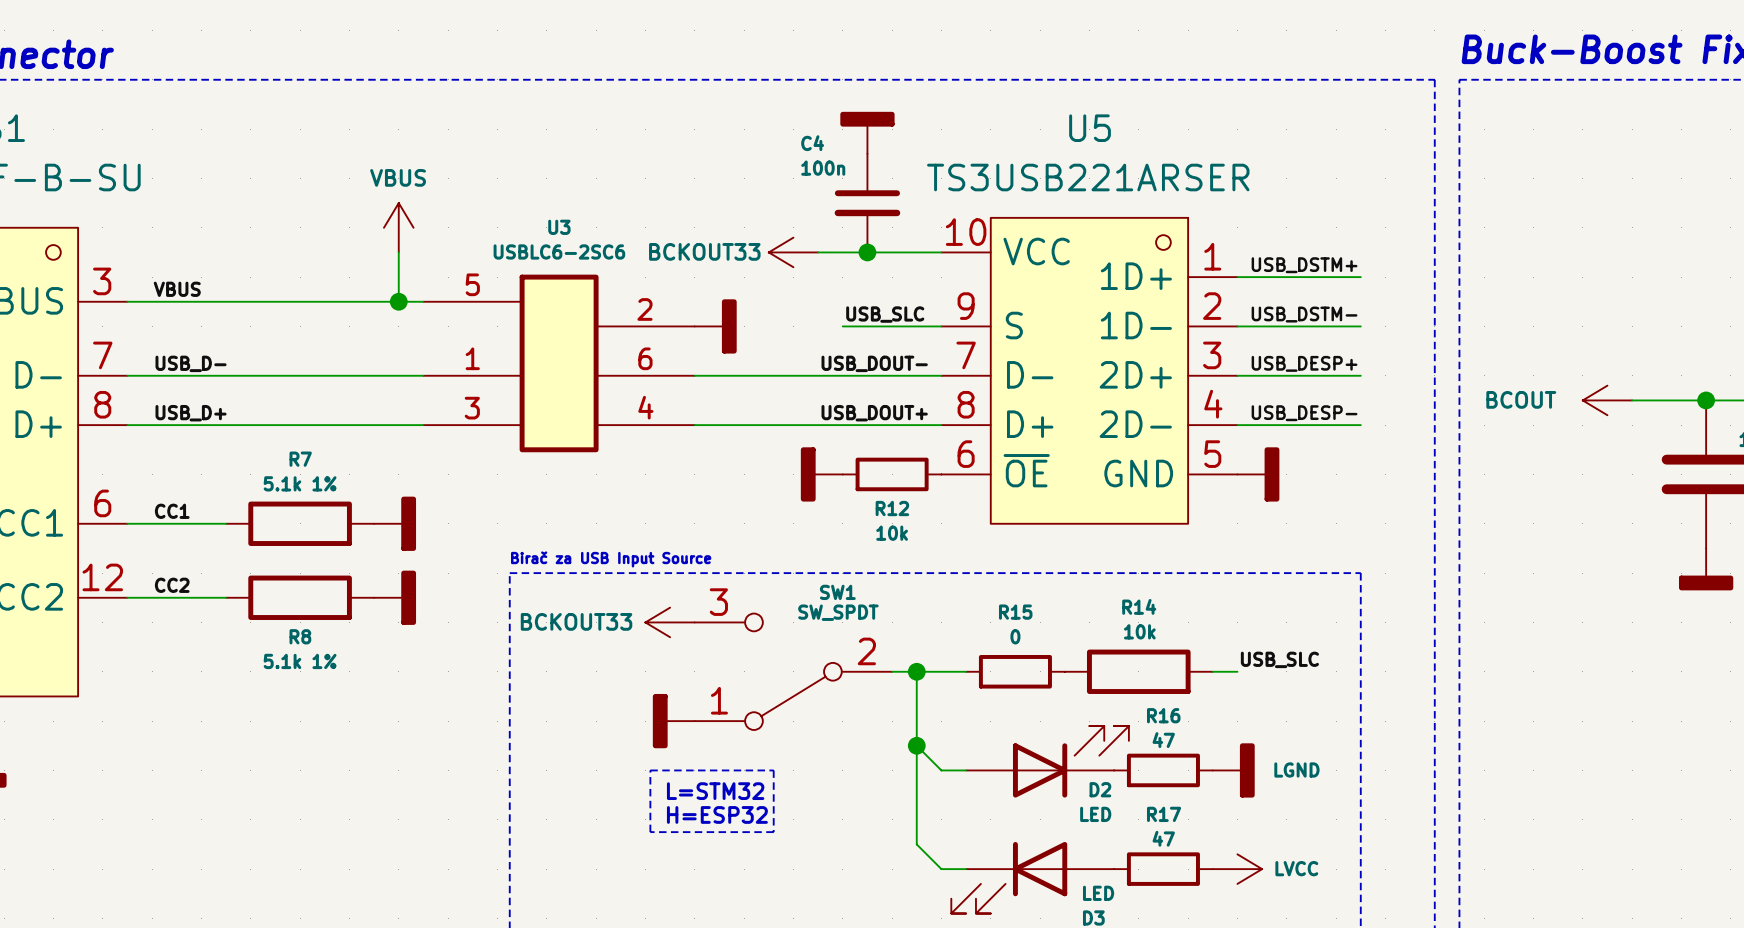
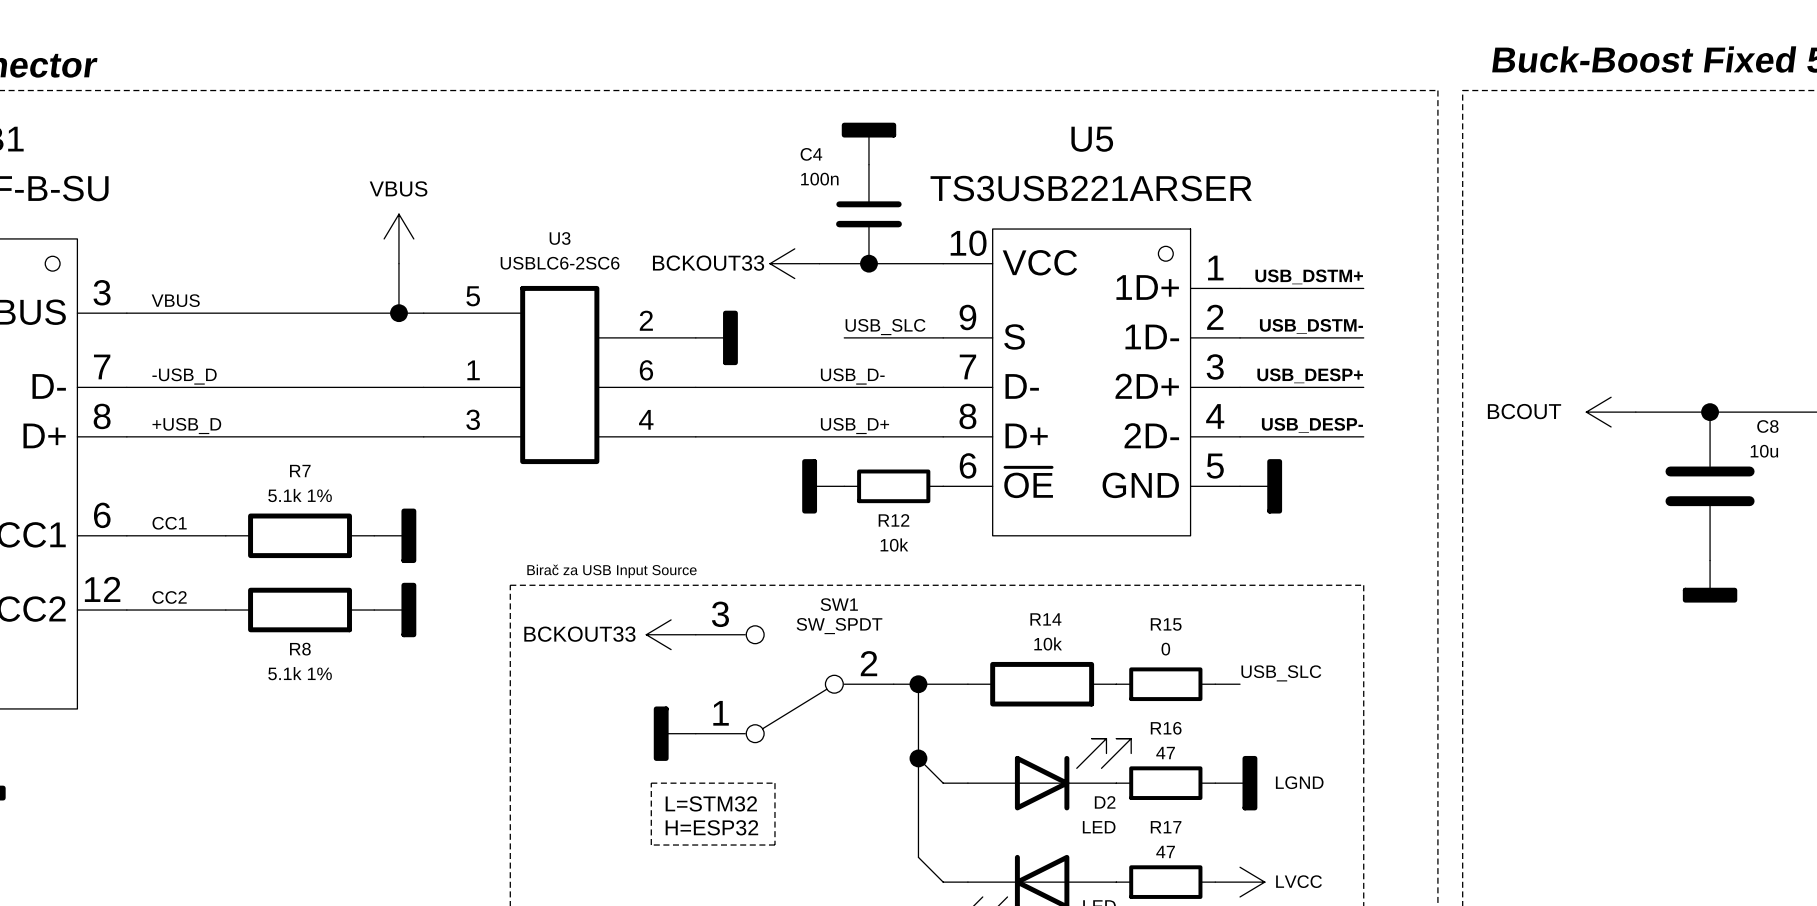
label: USB_D- (191, 363) -> -USB_D (184, 376)
label: USB_DOUT- (874, 363) -> USB_D- (852, 376)
label: USB_D+ (191, 413) -> +USB_D (186, 426)
label: USB_DOUT+ (874, 413) -> USB_D+ (854, 426)
R15 position: (1015, 671) -> (1165, 684)
R14 position: (1138, 671) -> (1042, 684)

